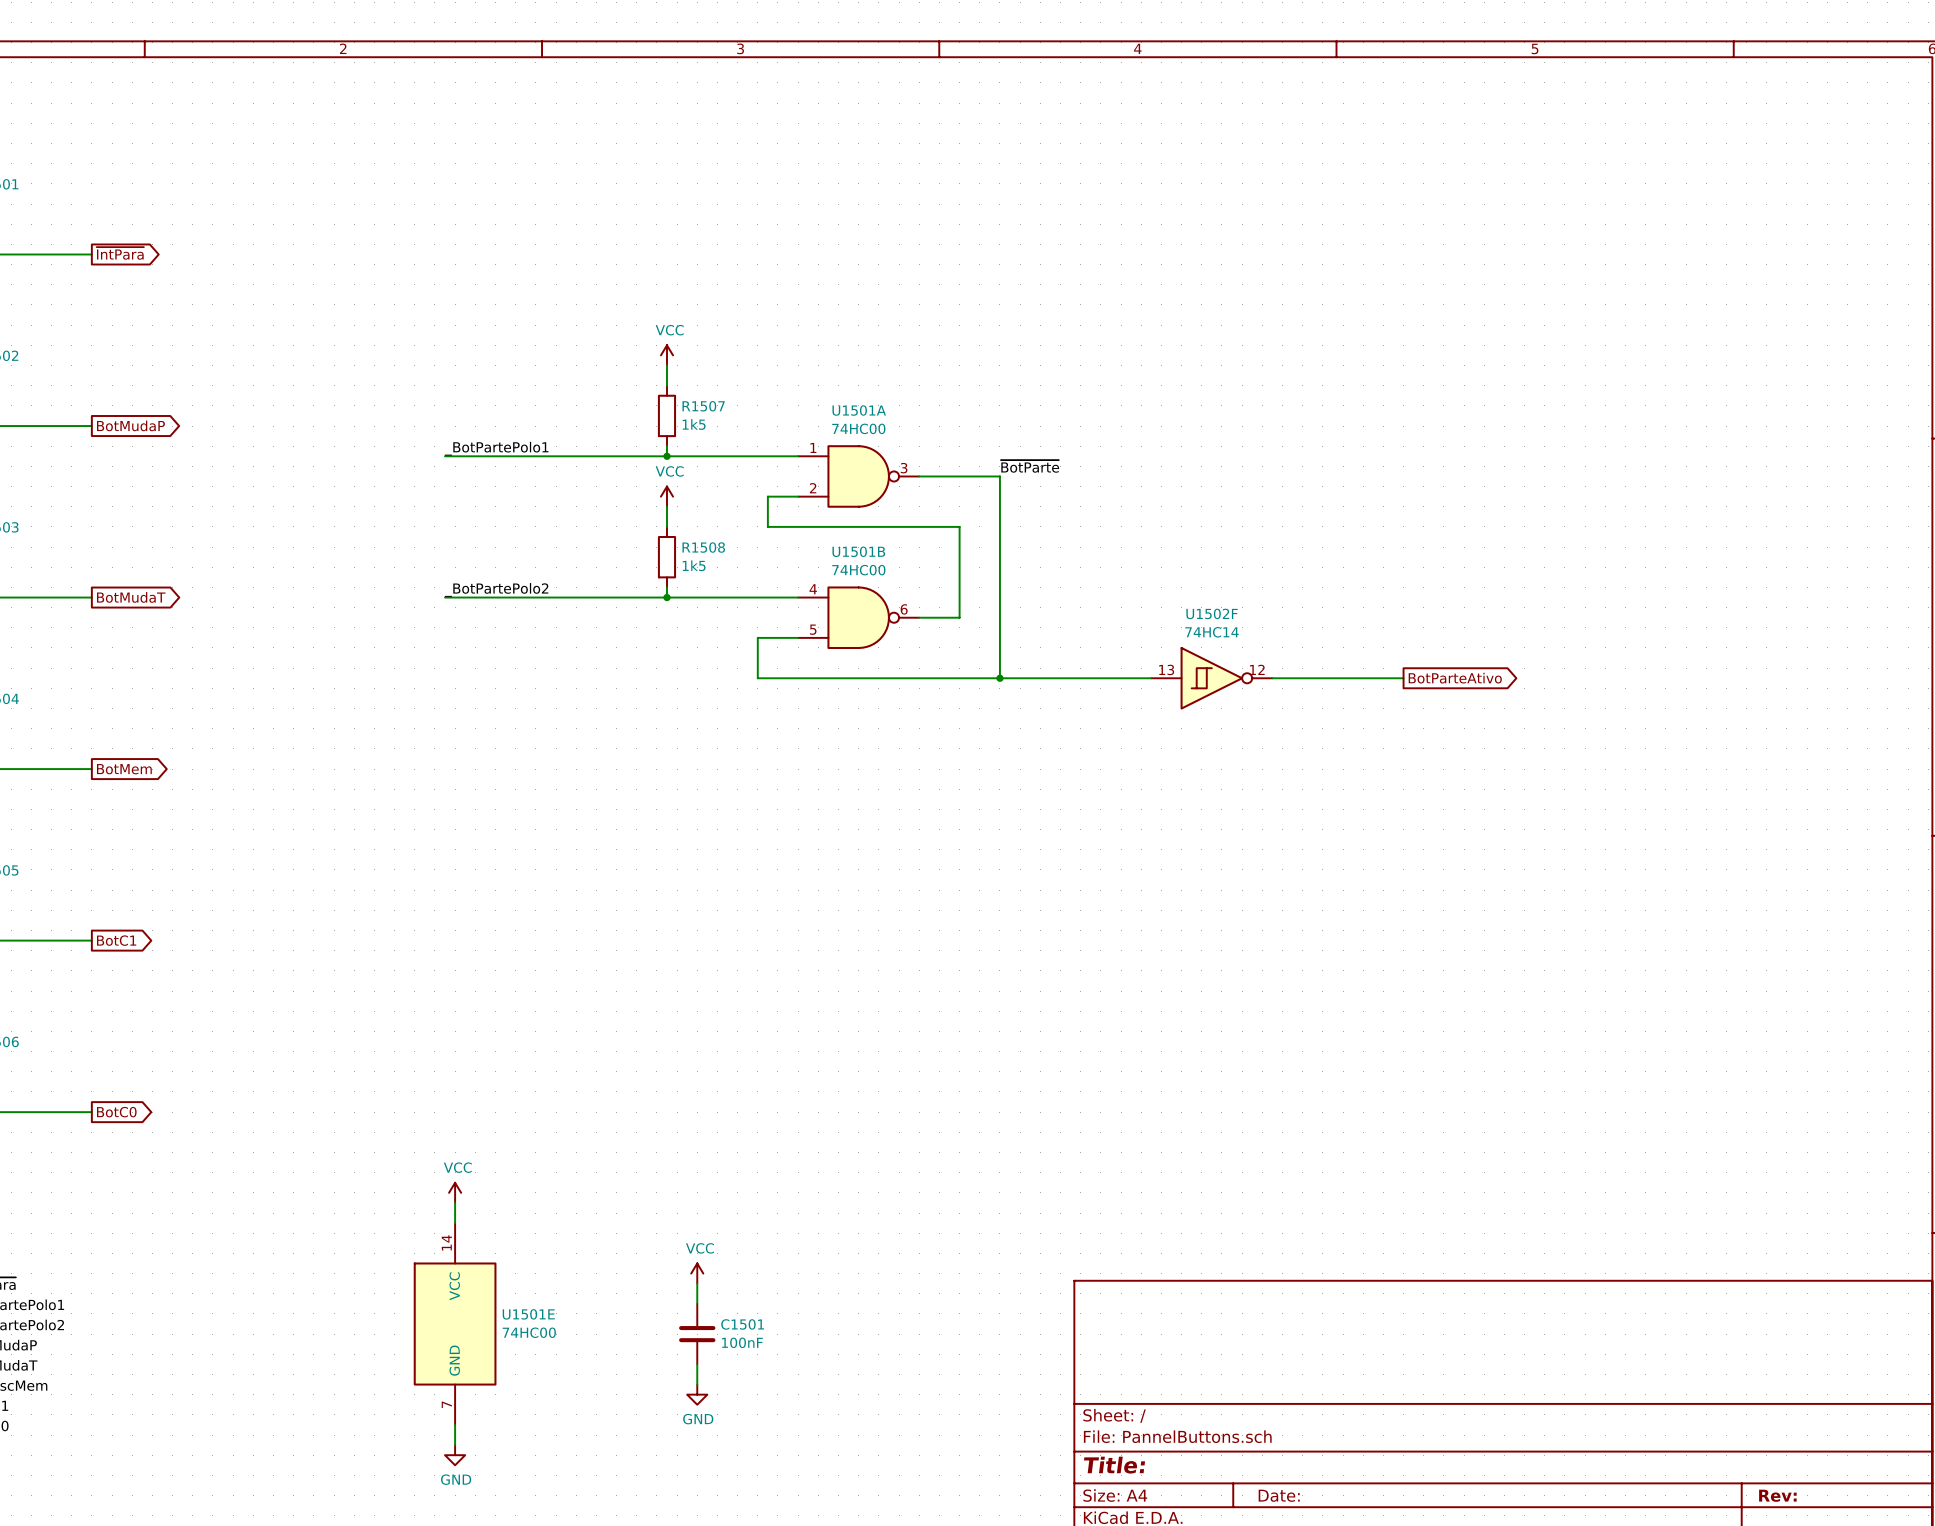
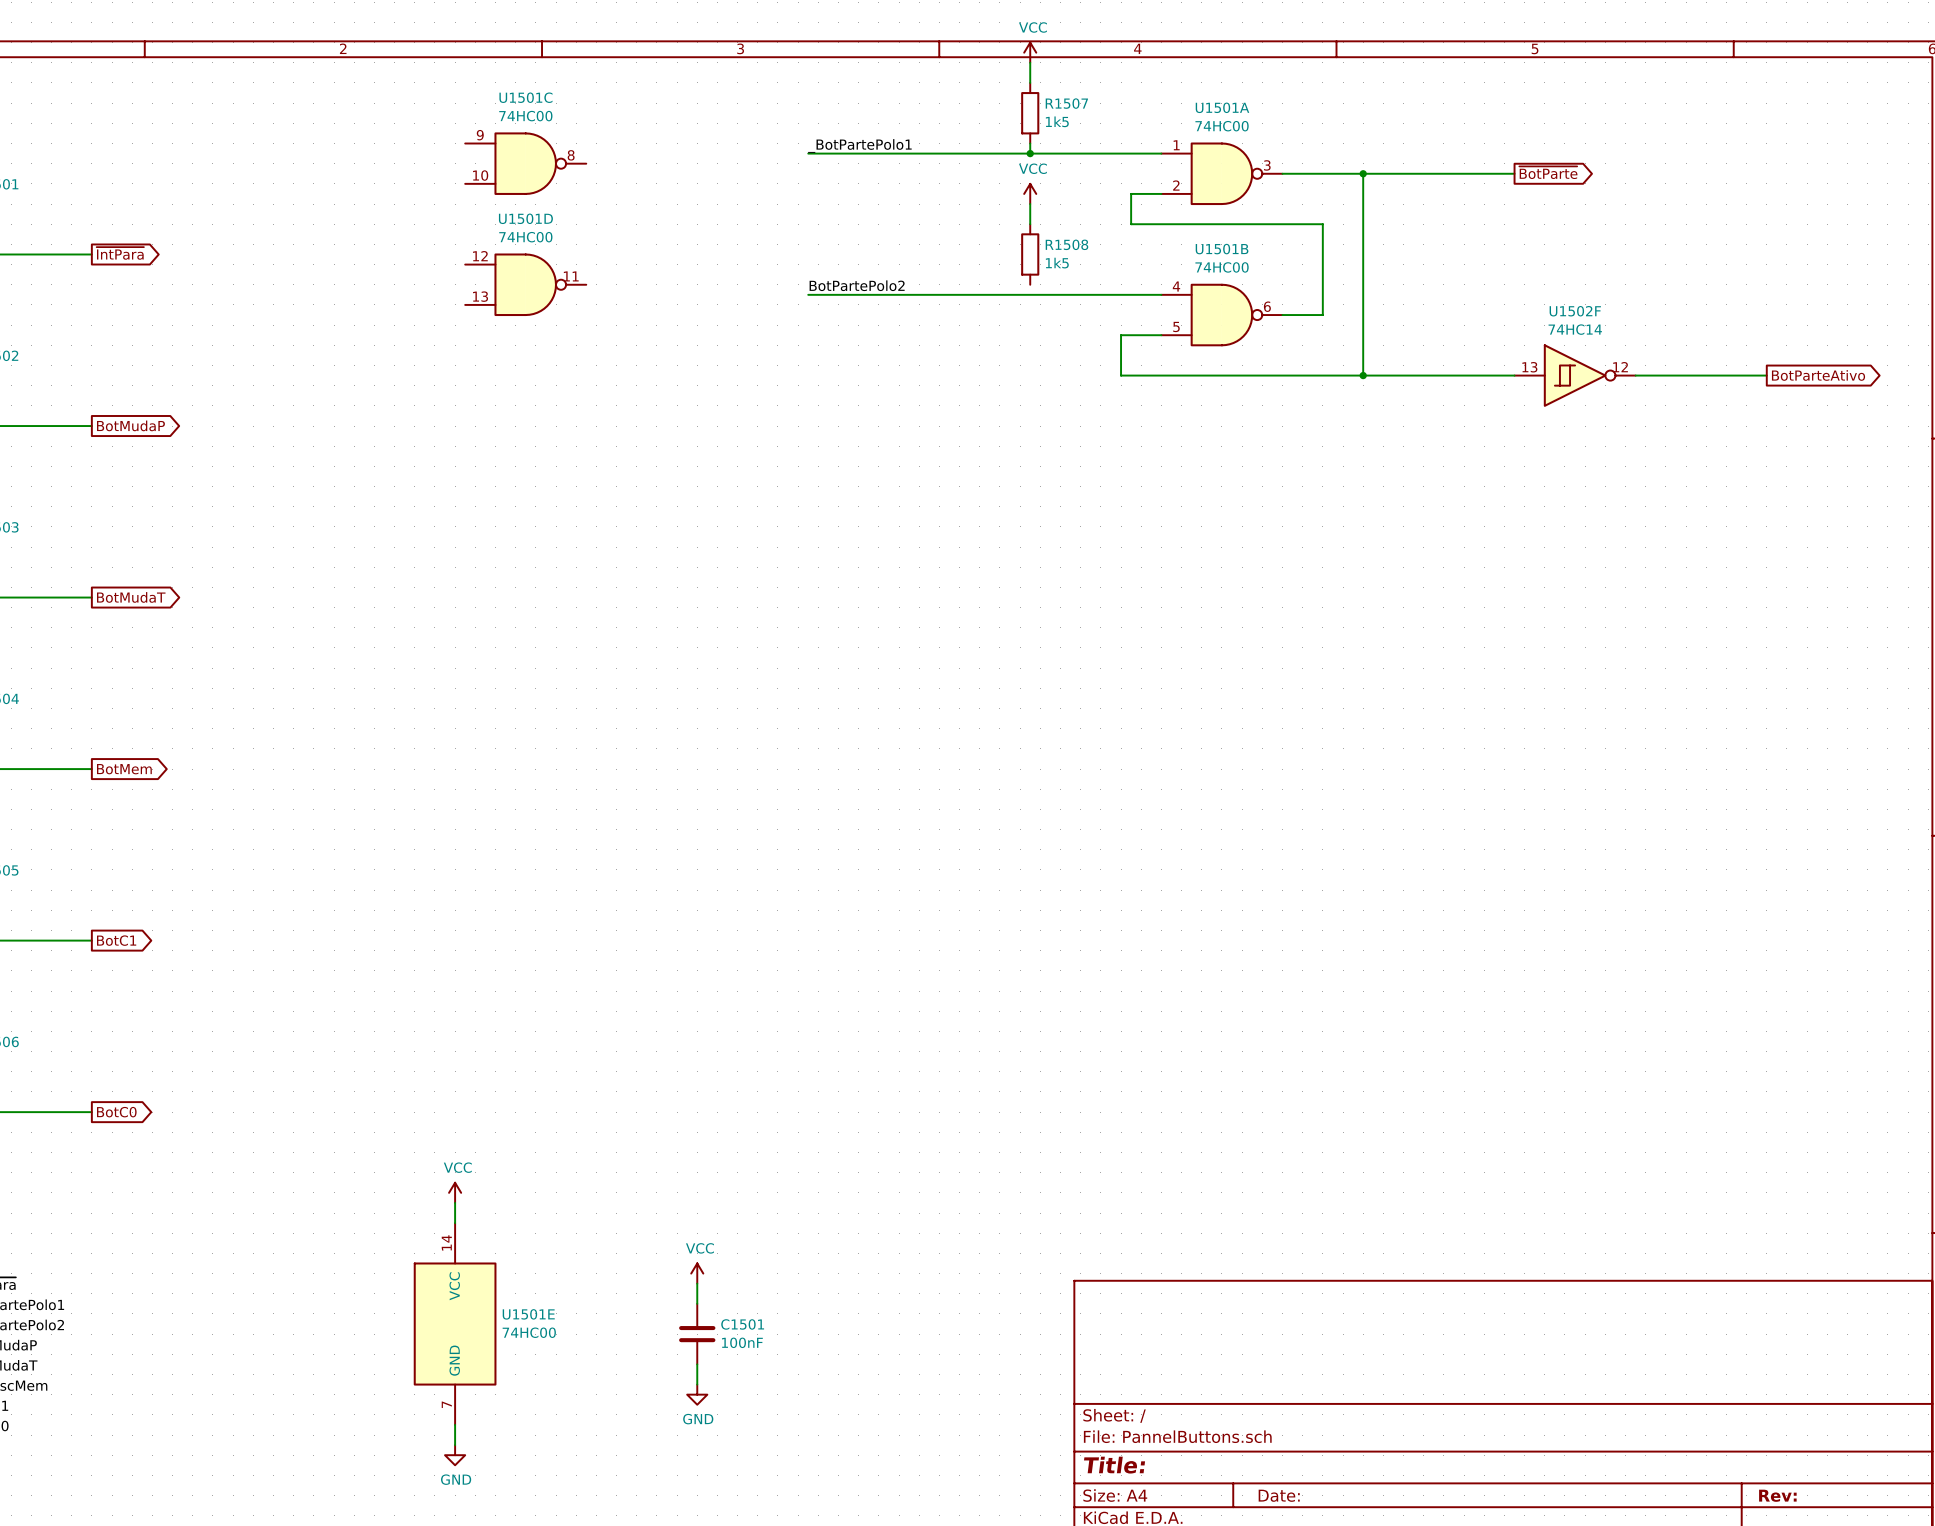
power symbol: none -> VCC (1030, 52)
wire: none -> (1030, 62) (1030, 82)
wire: none -> (1030, 143) (1030, 153)
label: none -> _BotPartePolo1 (859, 146)
wire: none -> (808, 153) (1161, 153)
junction: none -> (1030, 153)
U1501C: none -> 74HC00 (525, 163)
global label: none -> ~{BotParte} (1548, 172)
wire: none -> (1282, 173) (1514, 173)
wire: none -> (1363, 173) (1363, 375)
junction: none -> (1363, 173)
power symbol: none -> VCC (1030, 193)
wire: none -> (1161, 193) (1131, 193) (1131, 224) (1322, 224) (1322, 315) (1282, 315)
wire: none -> (1030, 204) (1030, 224)
U1501D: none -> 74HC00 (525, 284)
label: none -> BotPartePolo2 (857, 285)
wire: none -> (808, 294) (1161, 294)
wire: none -> (1161, 335) (1121, 335) (1121, 375) (1514, 375)
power symbol: VCC (666, 355) -> none
wire: (666, 365) (666, 385) -> none
junction: none -> (1363, 375)
wire: none -> (1635, 375) (1766, 375)
global label: none -> BotParteAtivo (1818, 375)
R1507 position: (666, 415) -> (1030, 113)
wire: (666, 446) (666, 456) -> none
label: _BotPartePolo1 (496, 448) -> none
wire: (445, 456) (798, 456) -> none
junction: (666, 456) -> none
label: ~{BotParte} (1030, 466) -> none
U1501A position: (858, 476) -> (1221, 173)
wire: (919, 476) (999, 476) (999, 678) -> none
power symbol: VCC (666, 496) -> none
wire: (798, 496) (767, 496) (767, 526) (959, 526) (959, 617) (919, 617) -> none
wire: (666, 506) (666, 526) -> none
R1508 position: (666, 557) -> (1030, 254)
wire: (666, 587) (666, 597) -> none
label: _BotPartePolo2 (496, 589) -> none
wire: (445, 597) (798, 597) -> none
junction: (666, 597) -> none
U1501B position: (858, 617) -> (1221, 315)
wire: (798, 637) (757, 637) (757, 678) (1151, 678) -> none
junction: (999, 678) -> none
U1502F position: (1211, 678) -> (1575, 375)
wire: (1272, 678) (1403, 678) -> none
global label: BotParteAtivo (1455, 678) -> none

